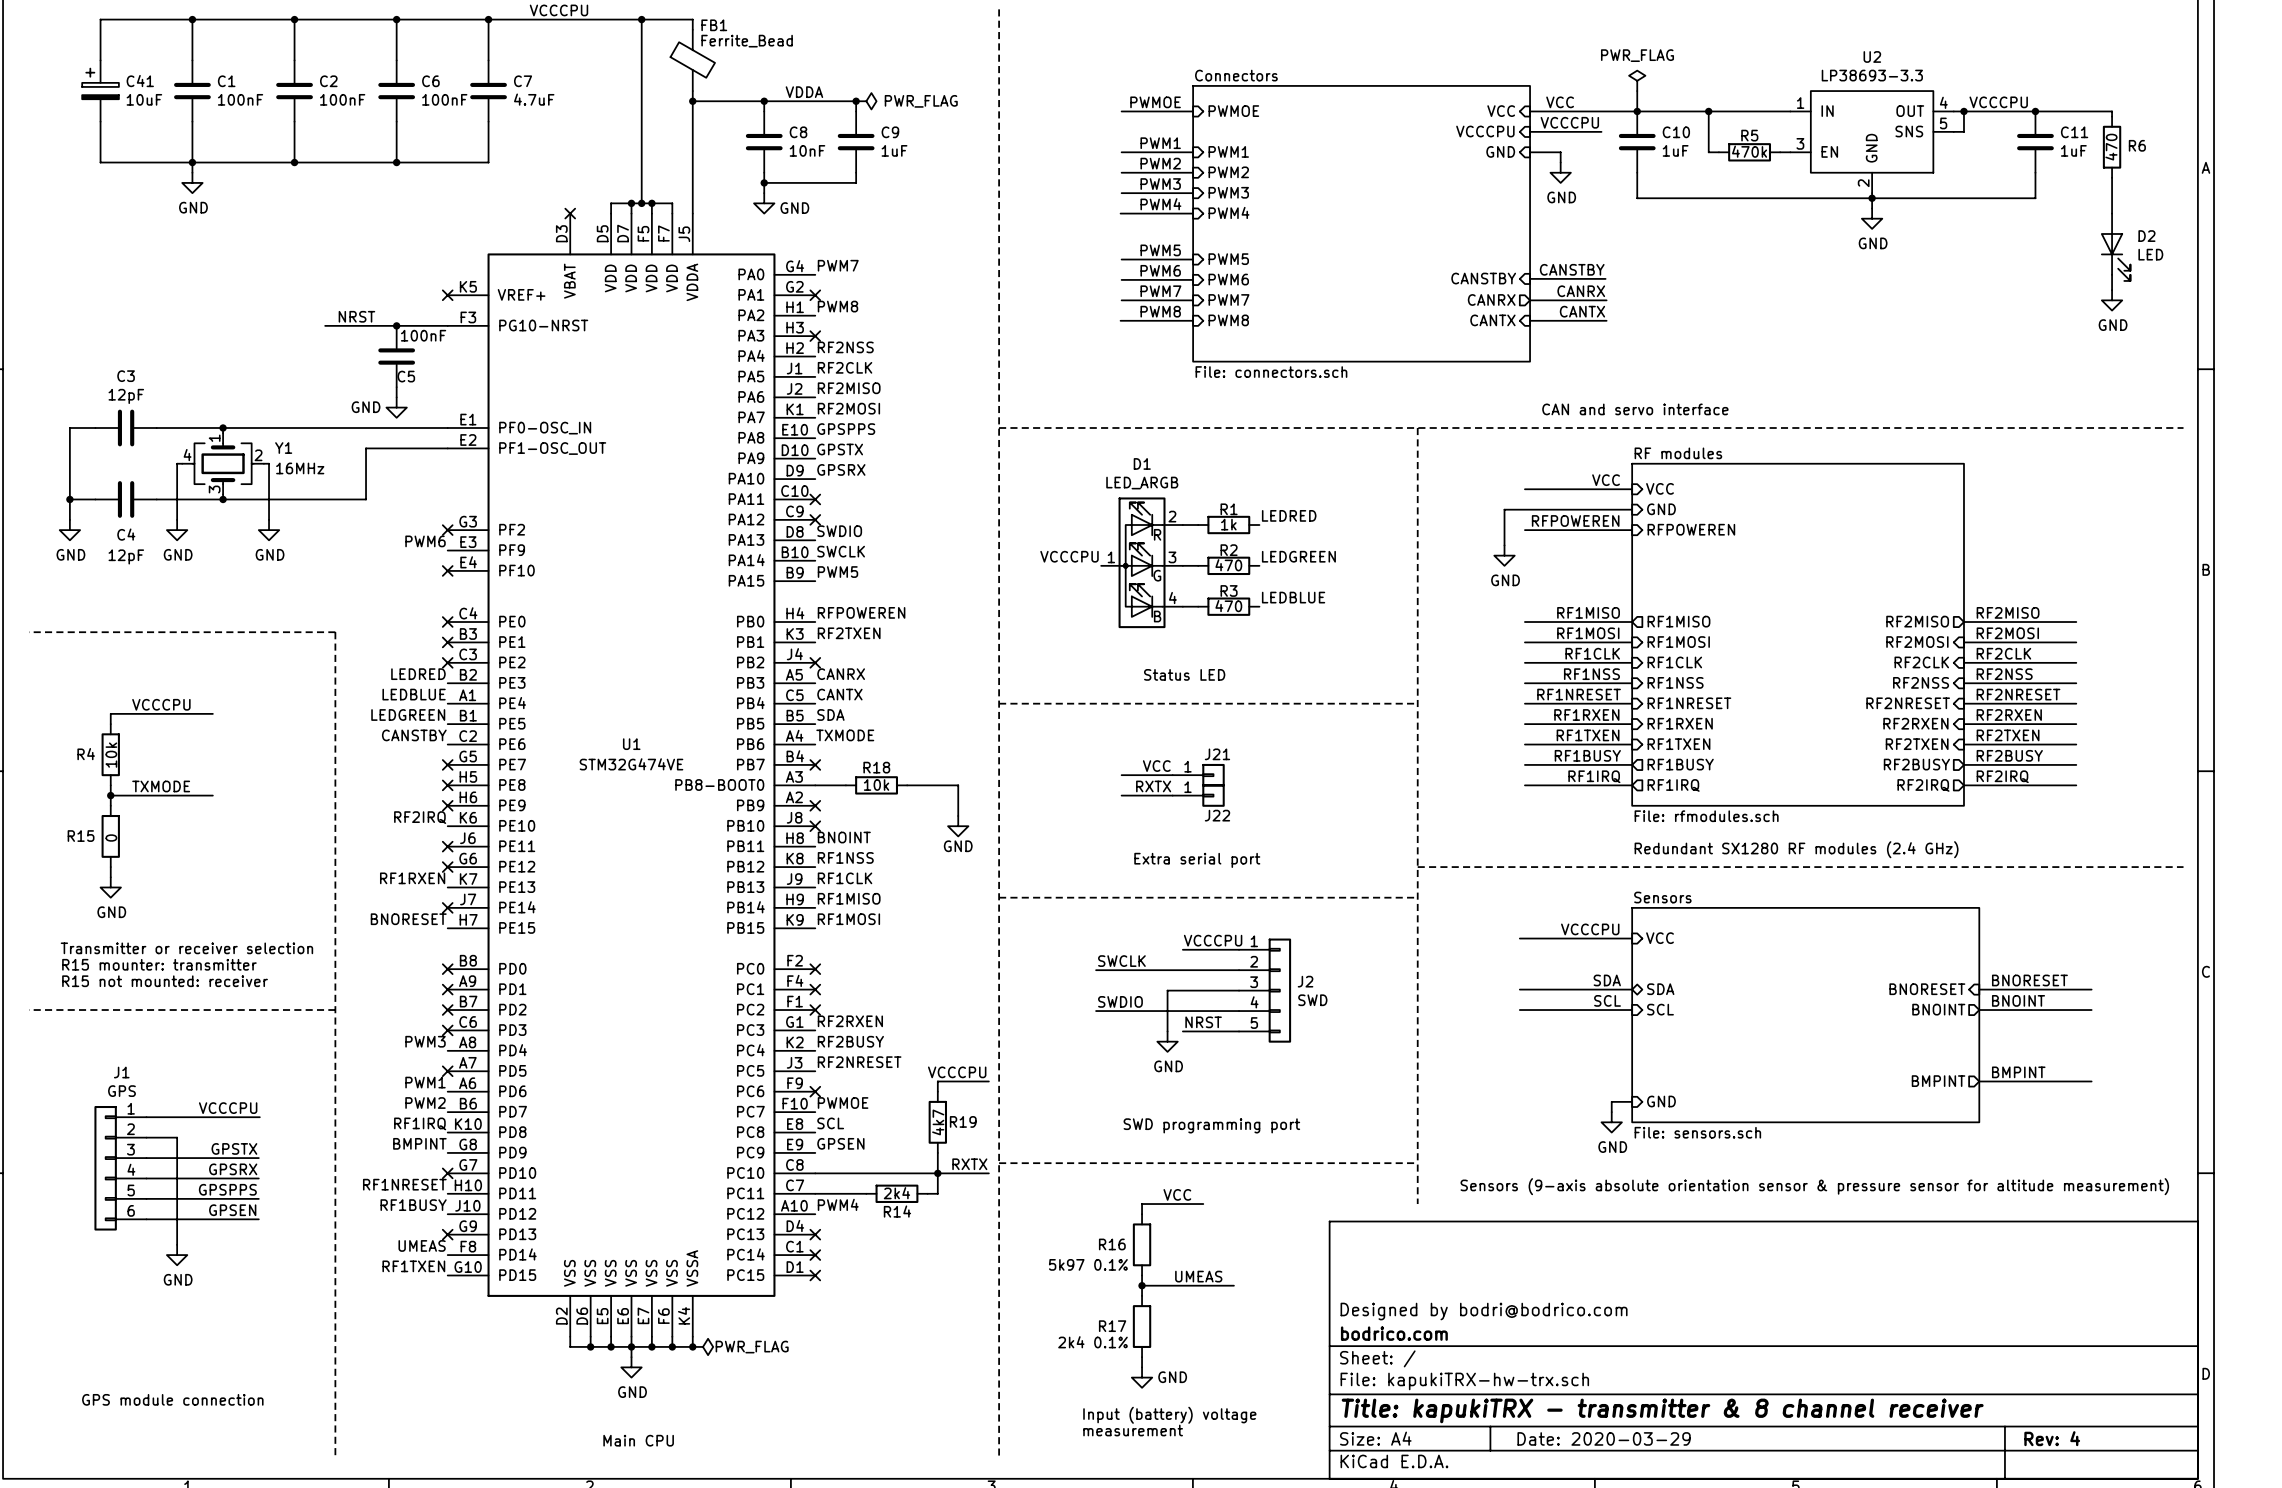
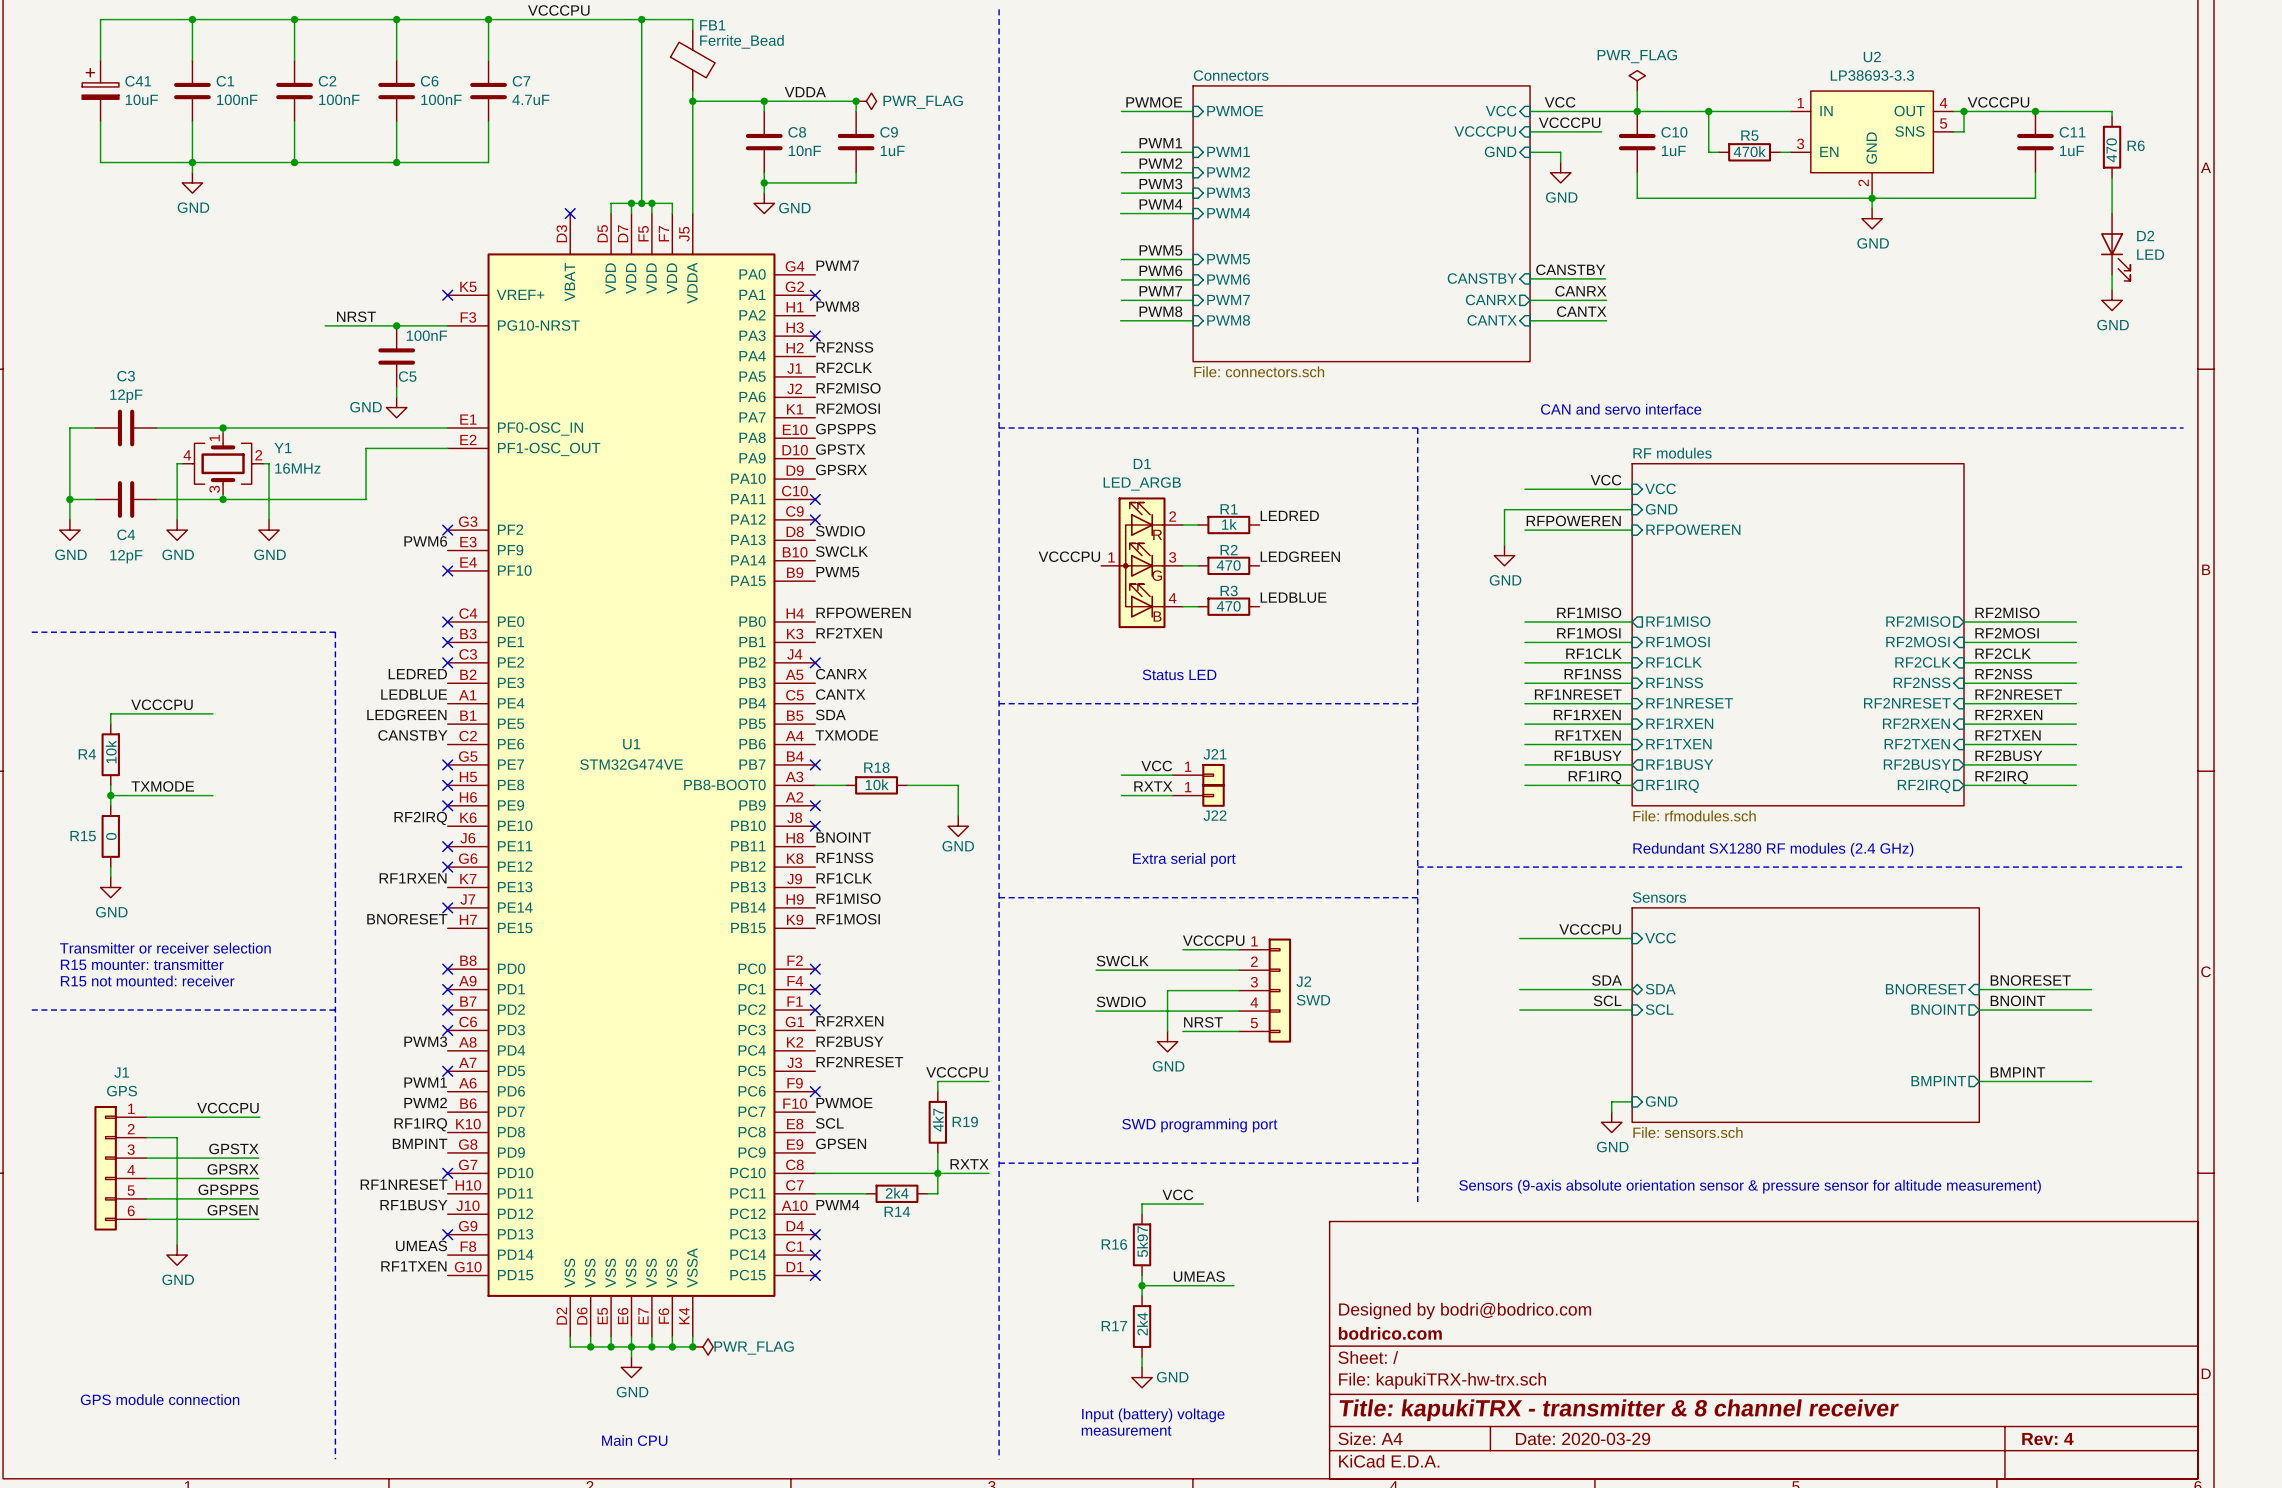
R16 value: 5k97 0.1% (1088, 1264) -> 5k97 (1142, 1241)
R17 value: 2k4 0.1% (1092, 1342) -> 2k4 (1142, 1324)

